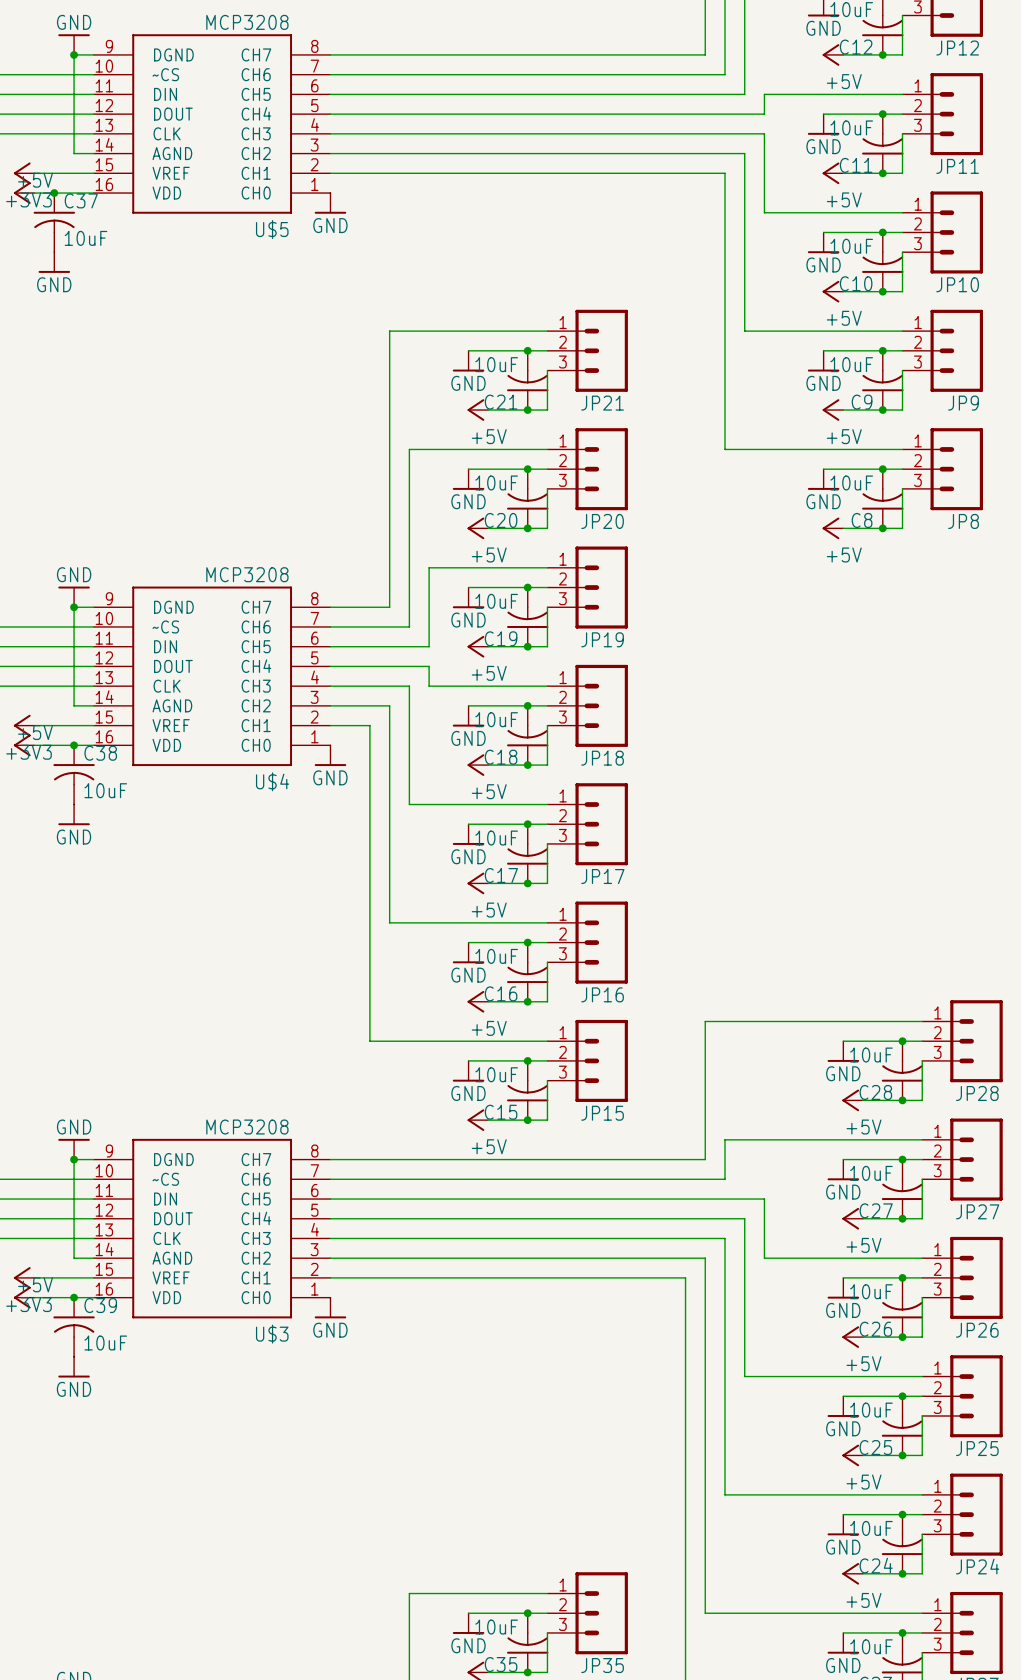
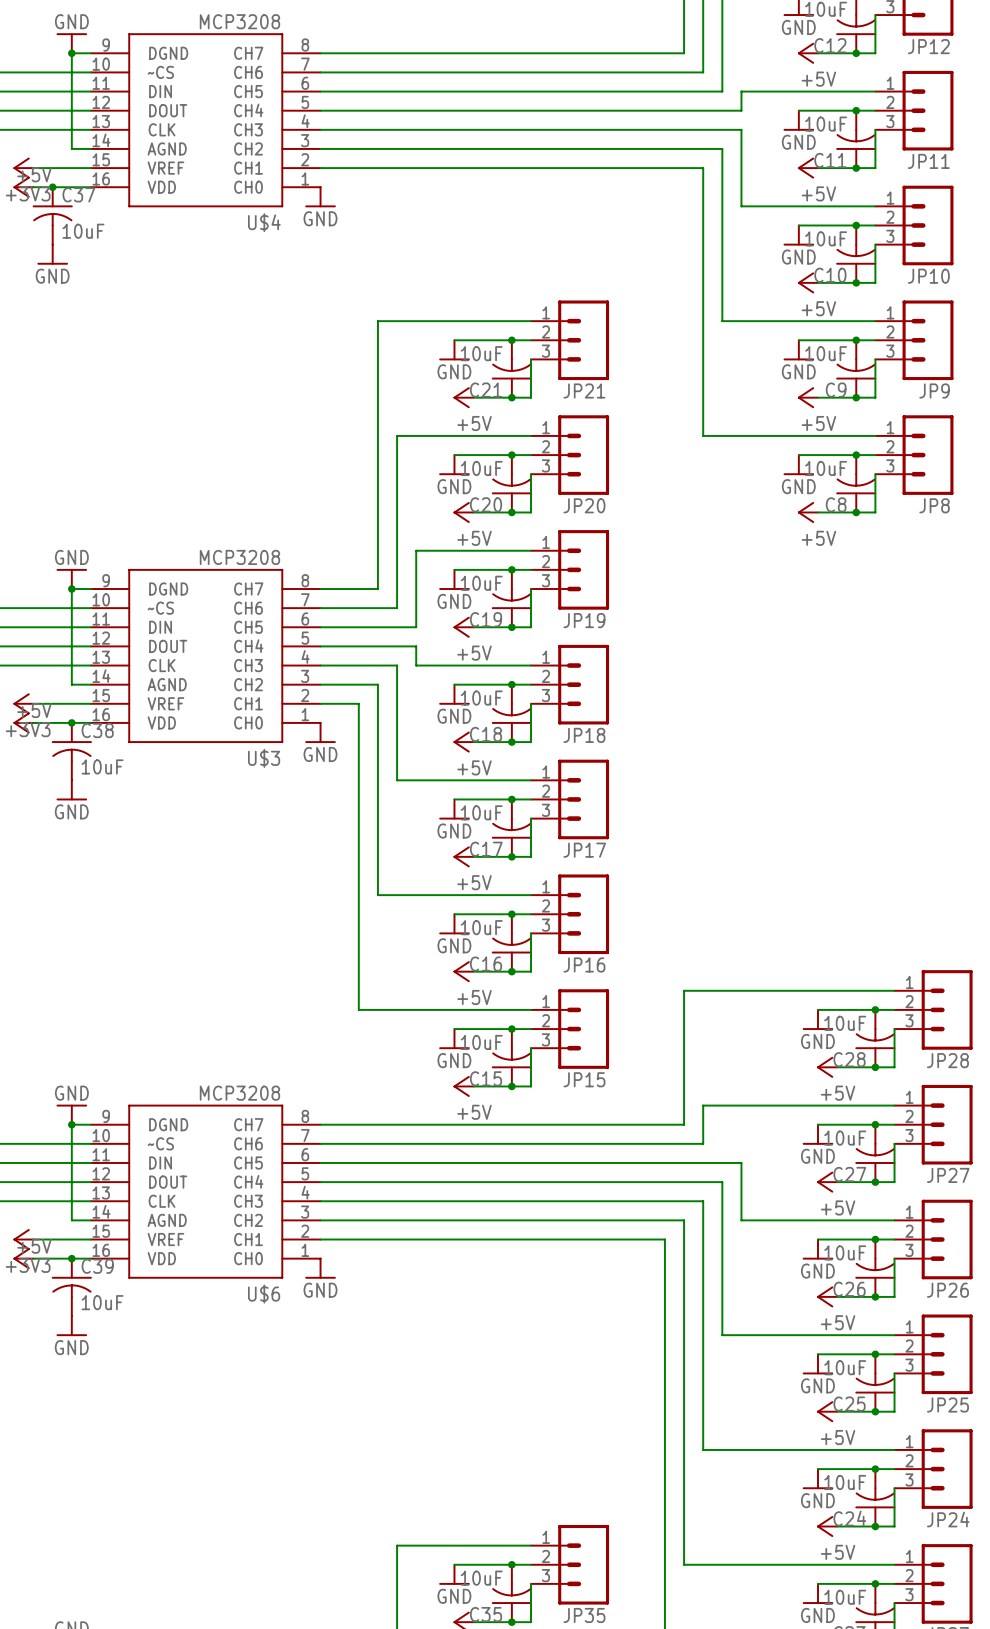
U$5 name: U$5 (272, 229) -> U$4 (264, 222)
U$4 name: U$4 (272, 781) -> U$3 (264, 758)
U$3 name: U$3 (272, 1334) -> U$6 (264, 1294)

